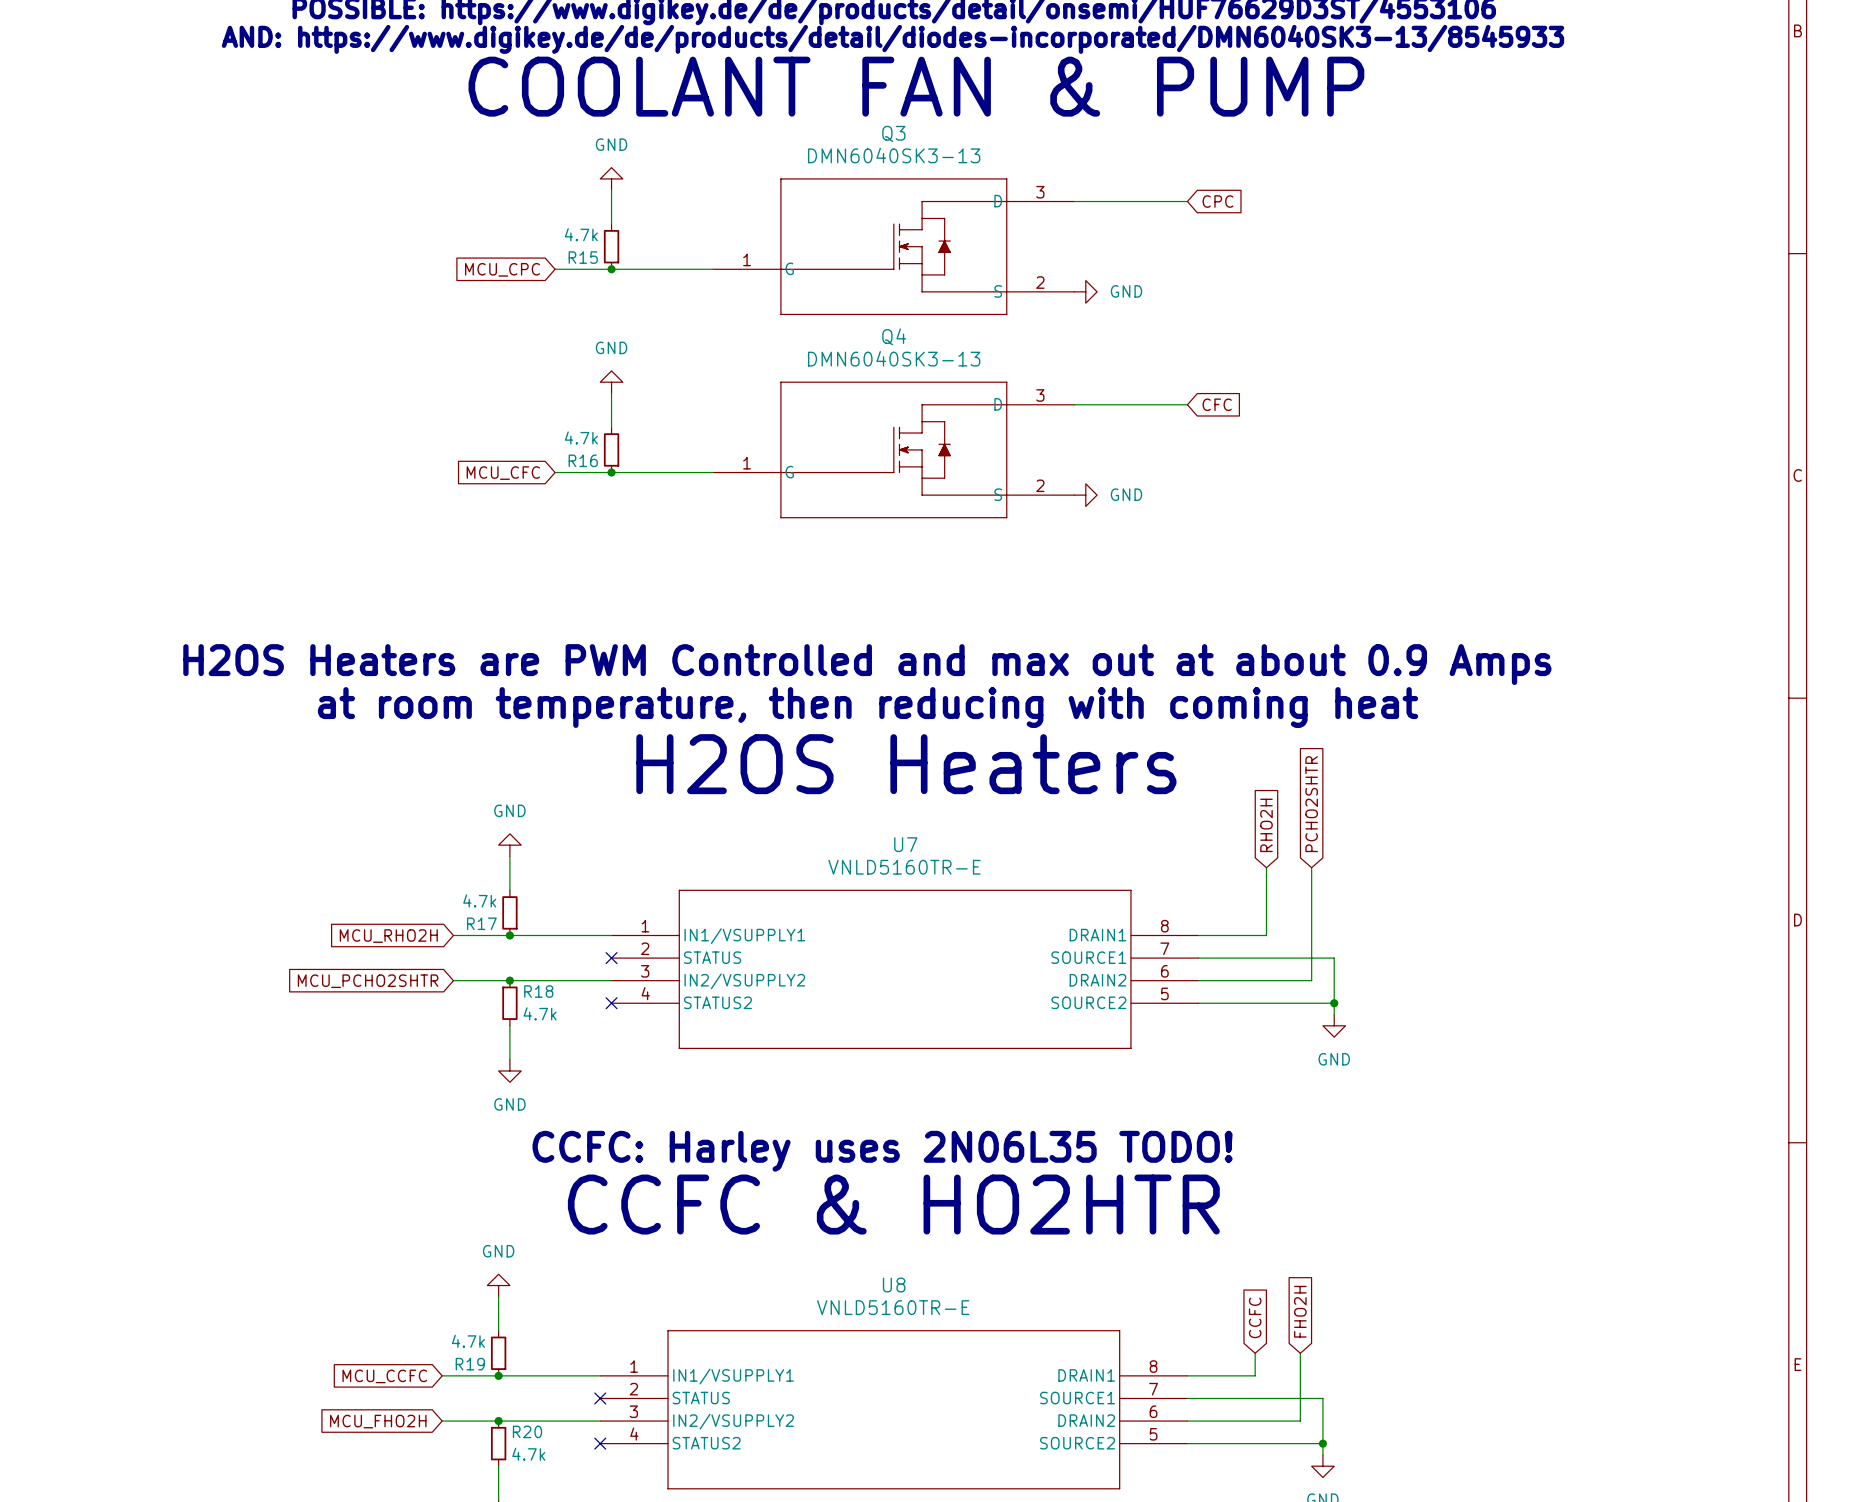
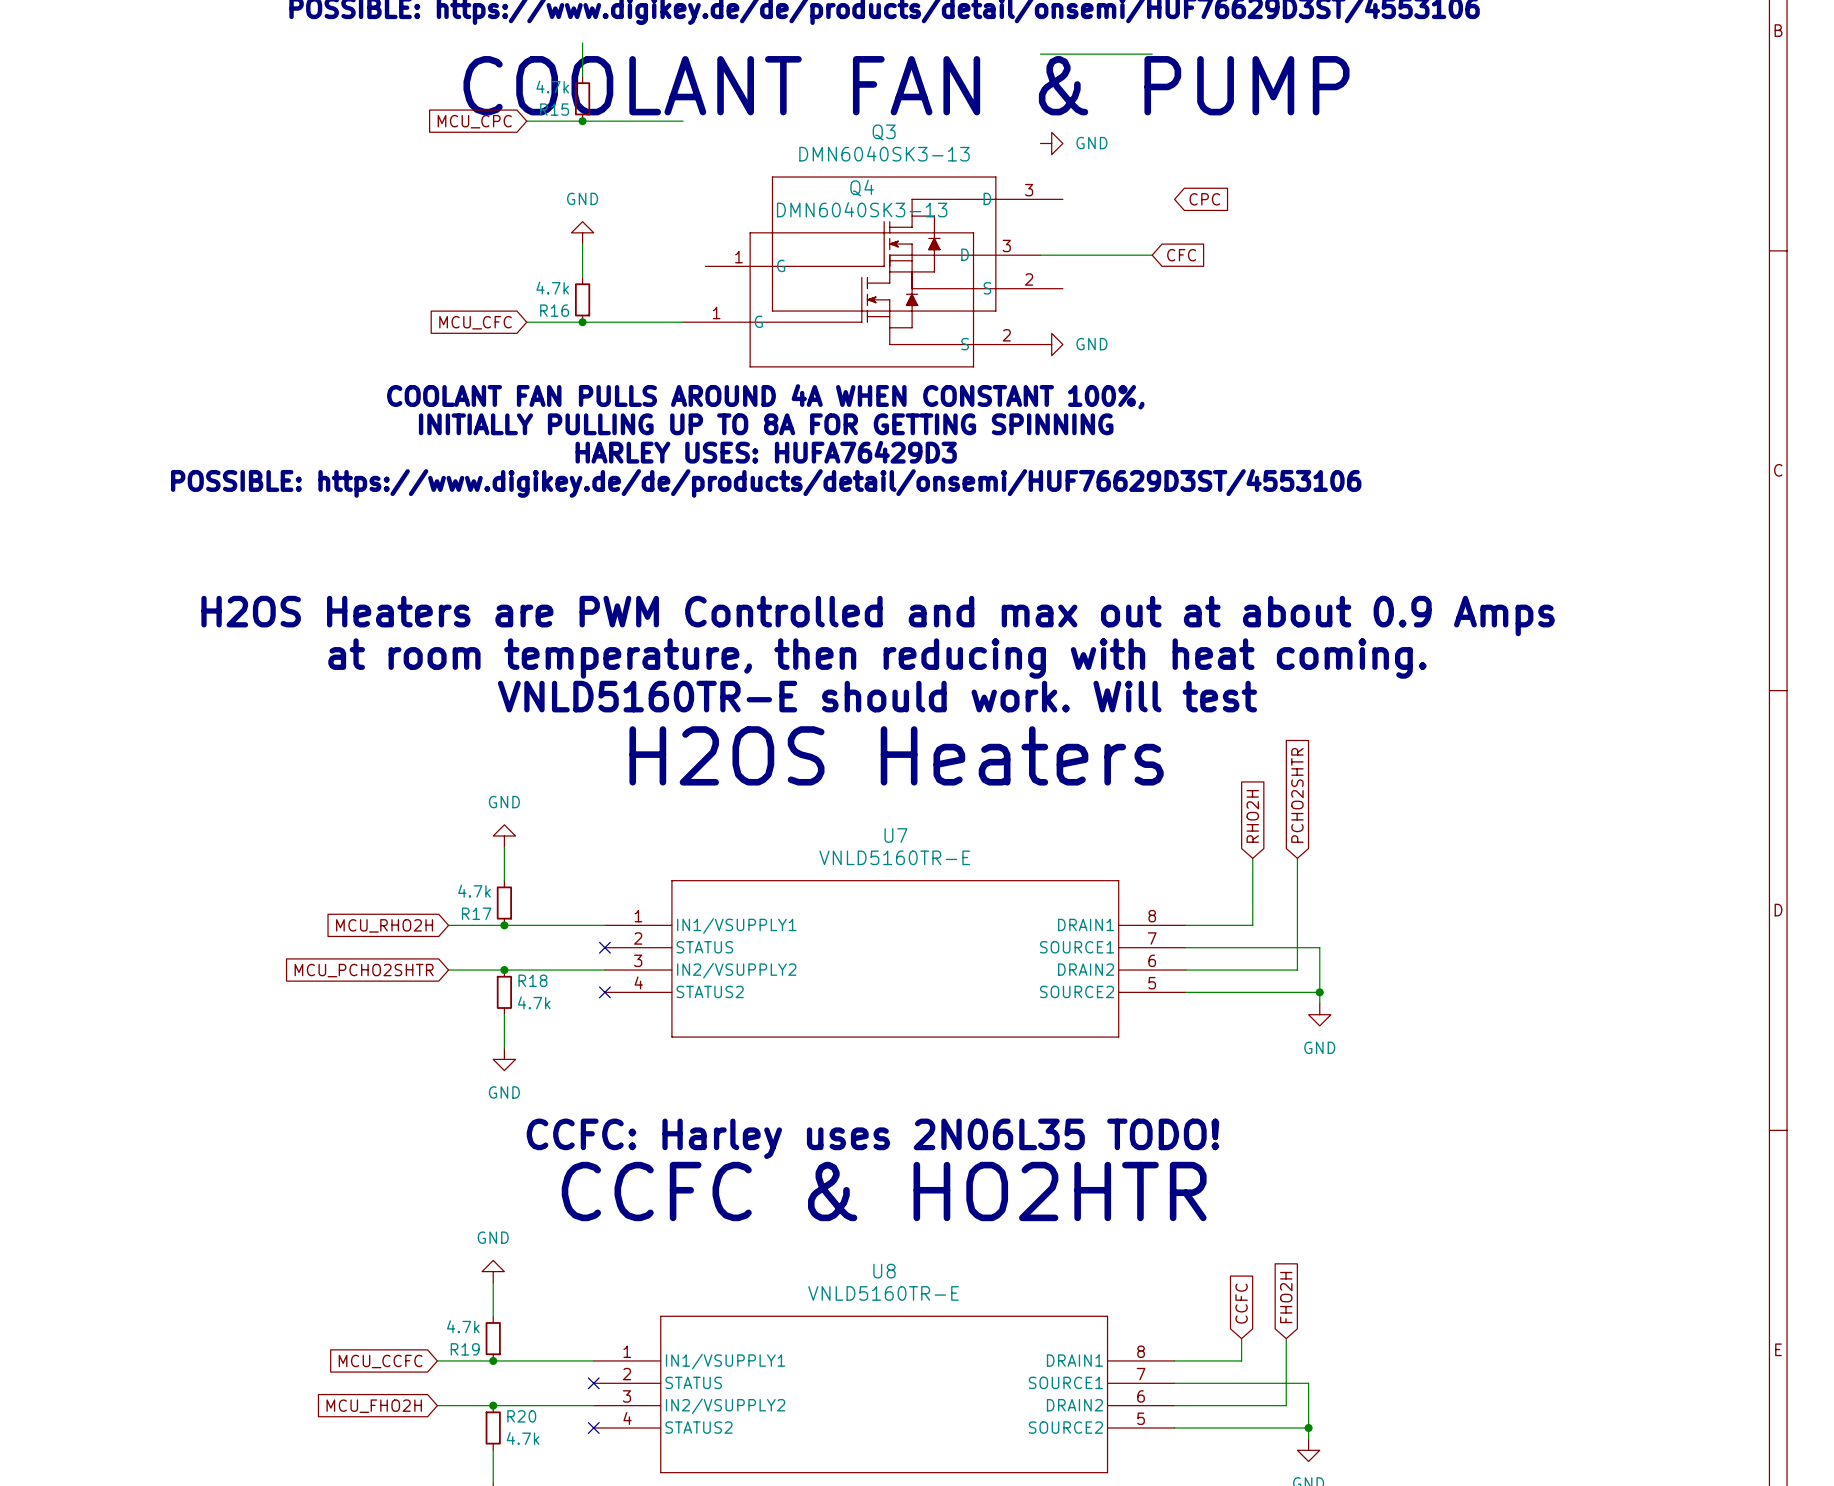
text: AND: https://www.digikey.de/de/products/detail/diodes-incorporated/DMN6040SK3-13/8545933 (892, 39) -> none
junction: none -> (582, 121)
power symbol: none -> GND (1051, 143)
power symbol position: GND (611, 178) -> GND (582, 232)
wire: (611, 190) (611, 224) -> (582, 42) (582, 76)
wire: (1074, 201) (1187, 201) -> (1040, 54) (1152, 54)
R15 position: (611, 246) -> (582, 98)
global label position: MCU_CPC (502, 269) -> MCU_CPC (474, 121)
wire: (555, 269) (713, 269) -> (526, 121) (683, 121)
junction: (611, 269) -> none
power symbol position: GND (1085, 291) -> GND (1051, 344)
junction: none -> (582, 322)
power symbol: GND (611, 382) -> none
wire: (611, 393) (611, 427) -> (582, 244) (582, 277)
text: none -> COOLANT FAN PULLS AROUND 4A WHEN CONSTANT 100%, (765, 396)
wire: (1074, 404) (1187, 404) -> (1040, 255) (1152, 255)
global label position: CFC (1217, 404) -> CFC (1181, 255)
text: none -> INITIALLY PULLING UP TO 8A FOR GETTING SPINNING (766, 424)
R16 position: (611, 449) -> (582, 299)
Q4 position: (893, 449) -> (861, 299)
text: none -> HARLEY USES: HUFA76429D3 (766, 452)
wire: (555, 472) (713, 472) -> (526, 322) (683, 322)
junction: (611, 472) -> none
global label position: MCU_CFC (503, 473) -> MCU_CFC (475, 322)
text: none -> POSSIBLE: https://www.digikey.de/de/products/detail/onsemi/HUF76629D3ST/4553106 (766, 483)
power symbol: GND (1085, 495) -> none
text position: H2OS Heaters are PWM Controlled and max out at about 0.9 Amps (867, 664) -> H2OS Heaters are PWM Controlled and max out at about 0.9 Amps (878, 616)
text: none -> VNLD5160TR-E should work. Will test (877, 696)
text: at room temperature, then reducing with coming heat (868, 707) -> at room temperature, then reducing with heat coming. (877, 658)

